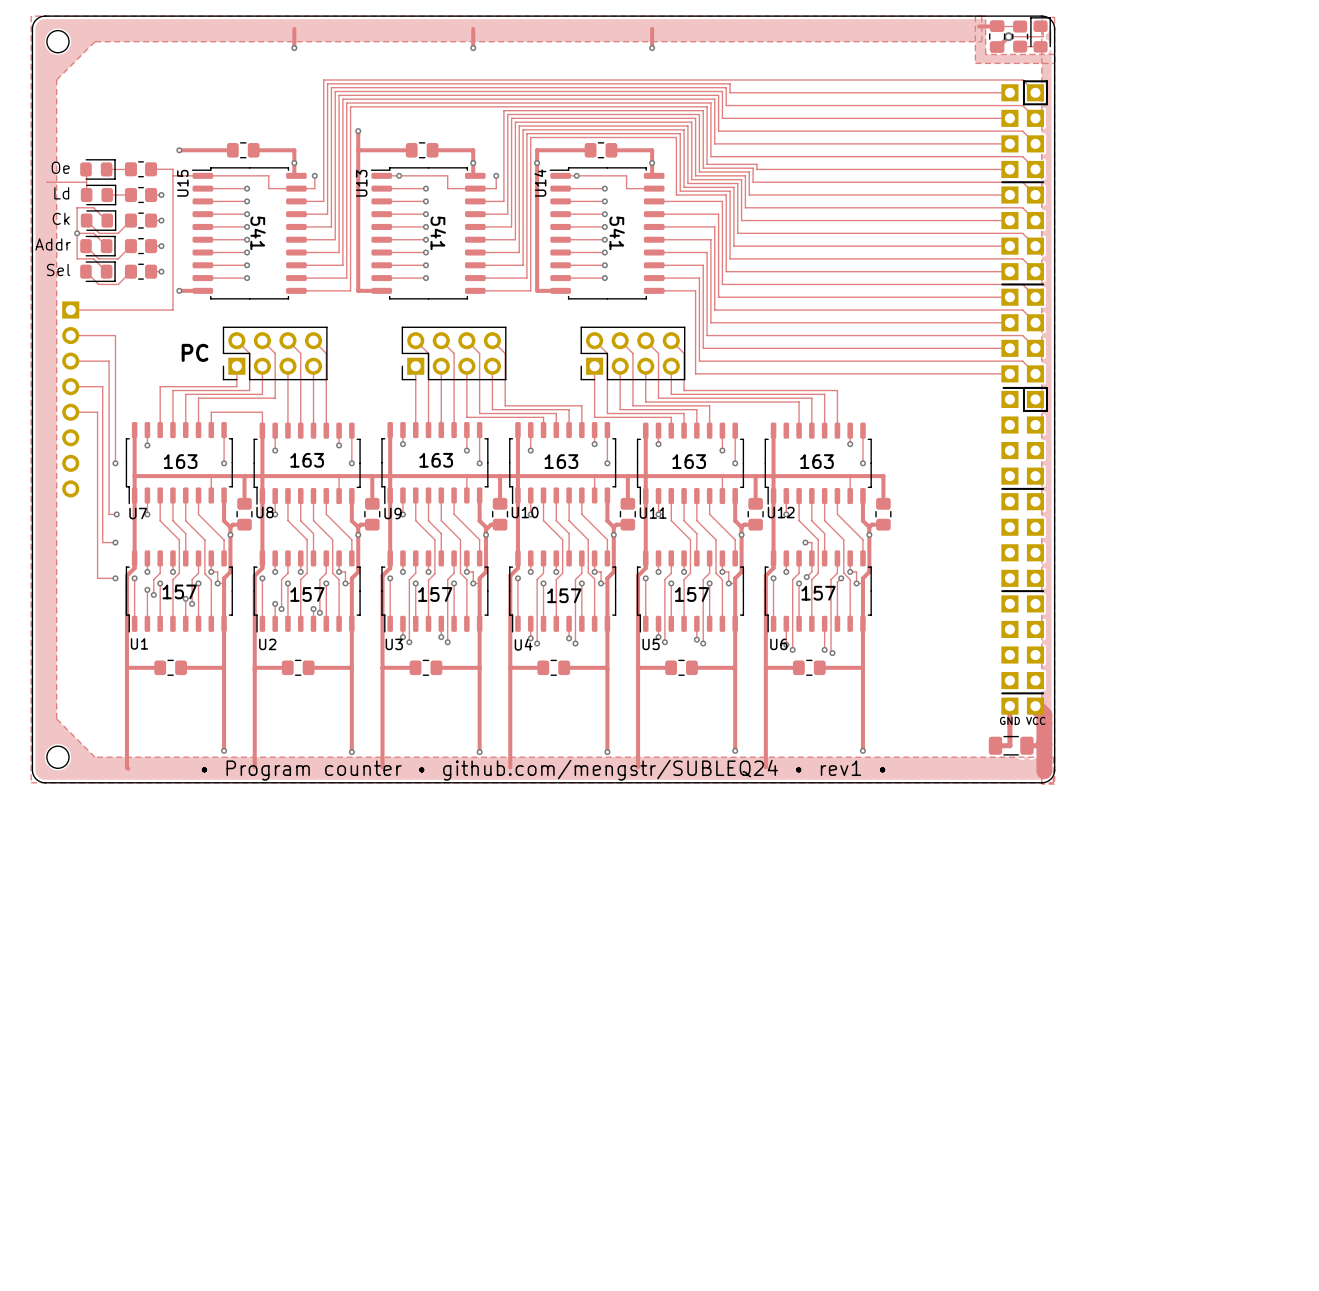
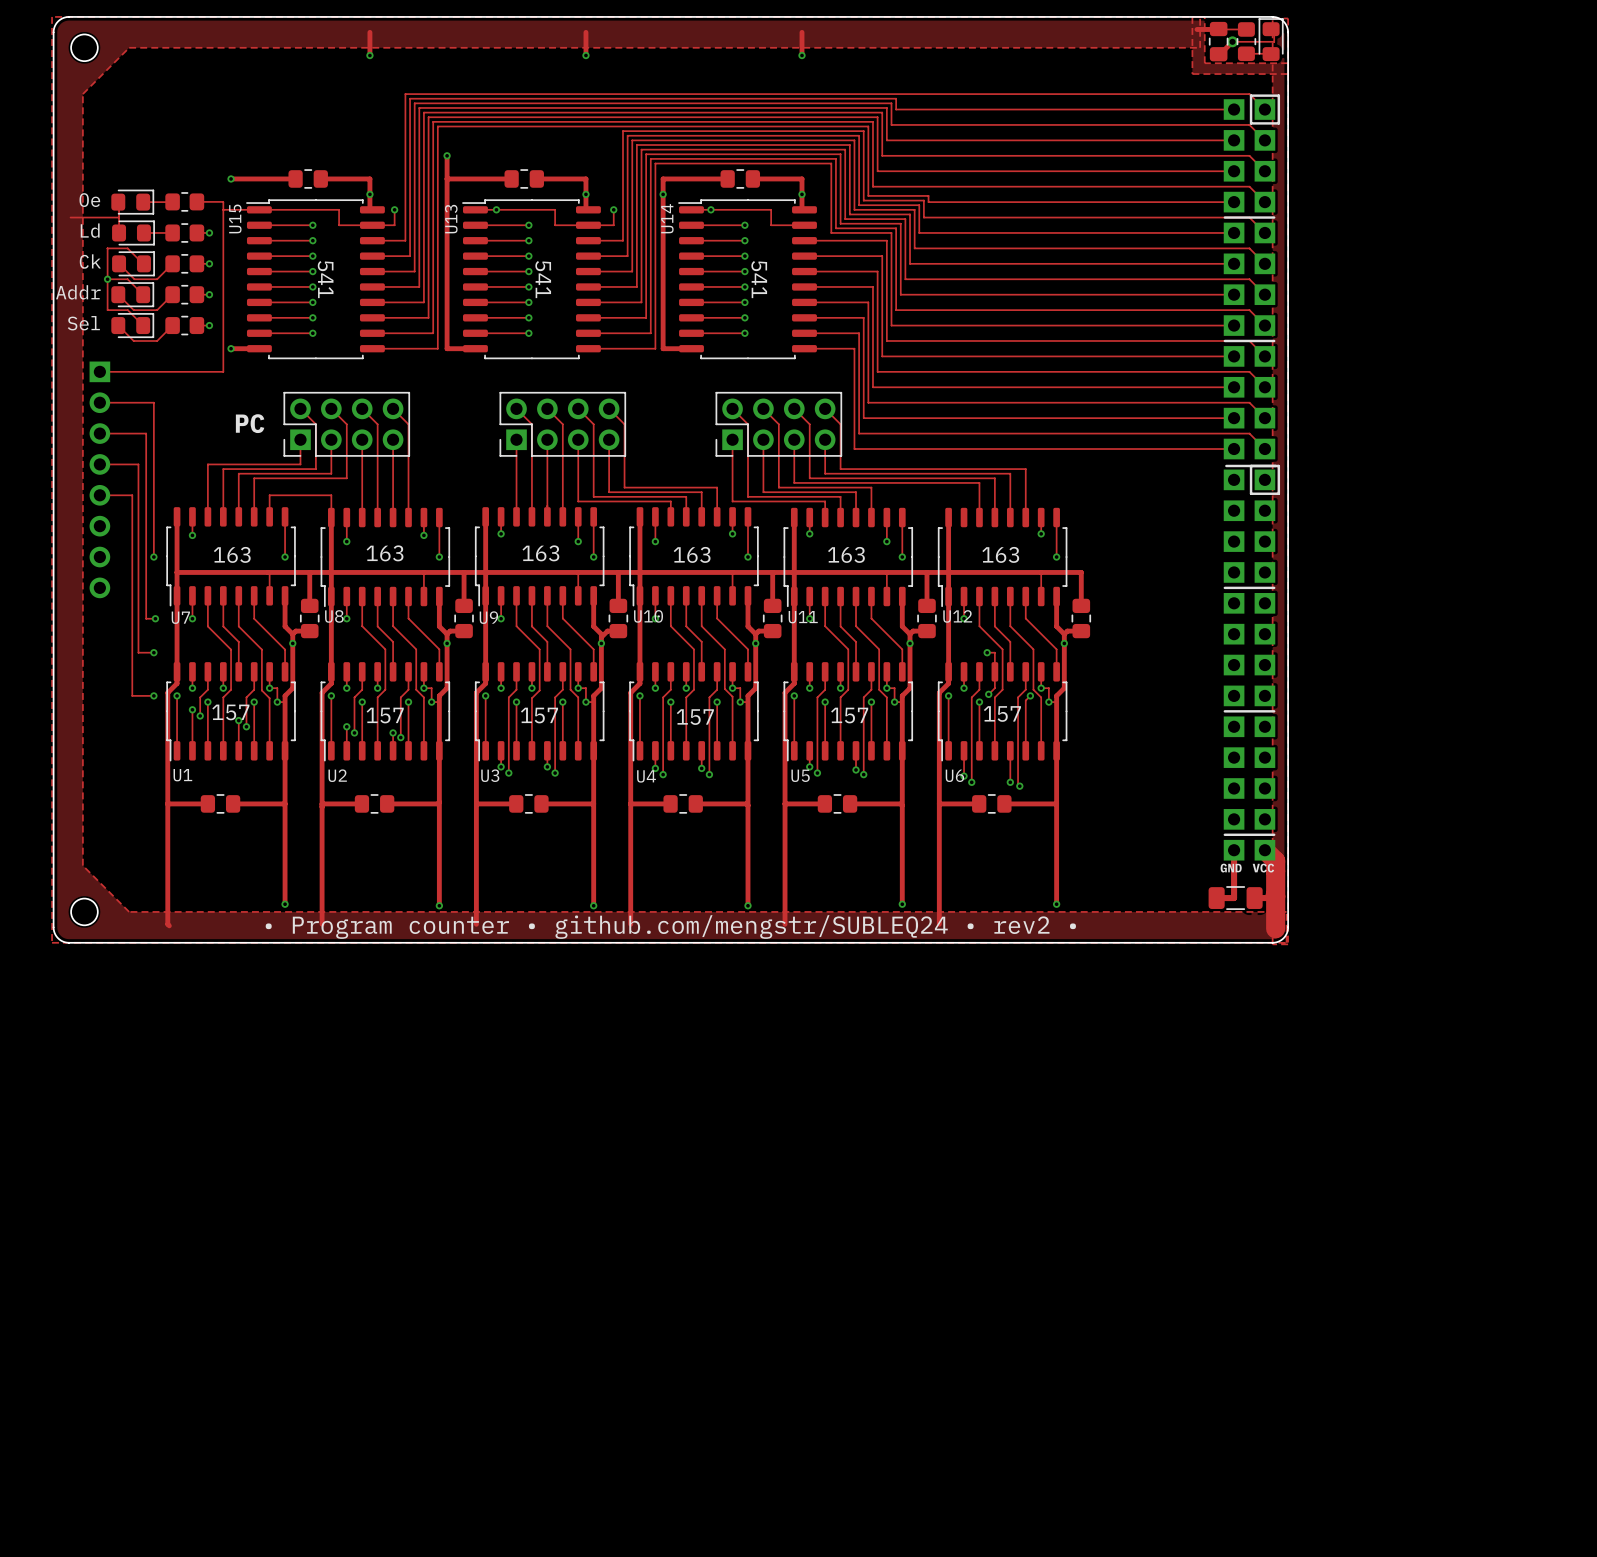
text: • Program counter • github.com/mengstr/SUBLEQ24 • rev1 • (543, 770) -> • Program counter • github.com/mengstr/SUBLEQ24 • rev2 • (670, 927)

